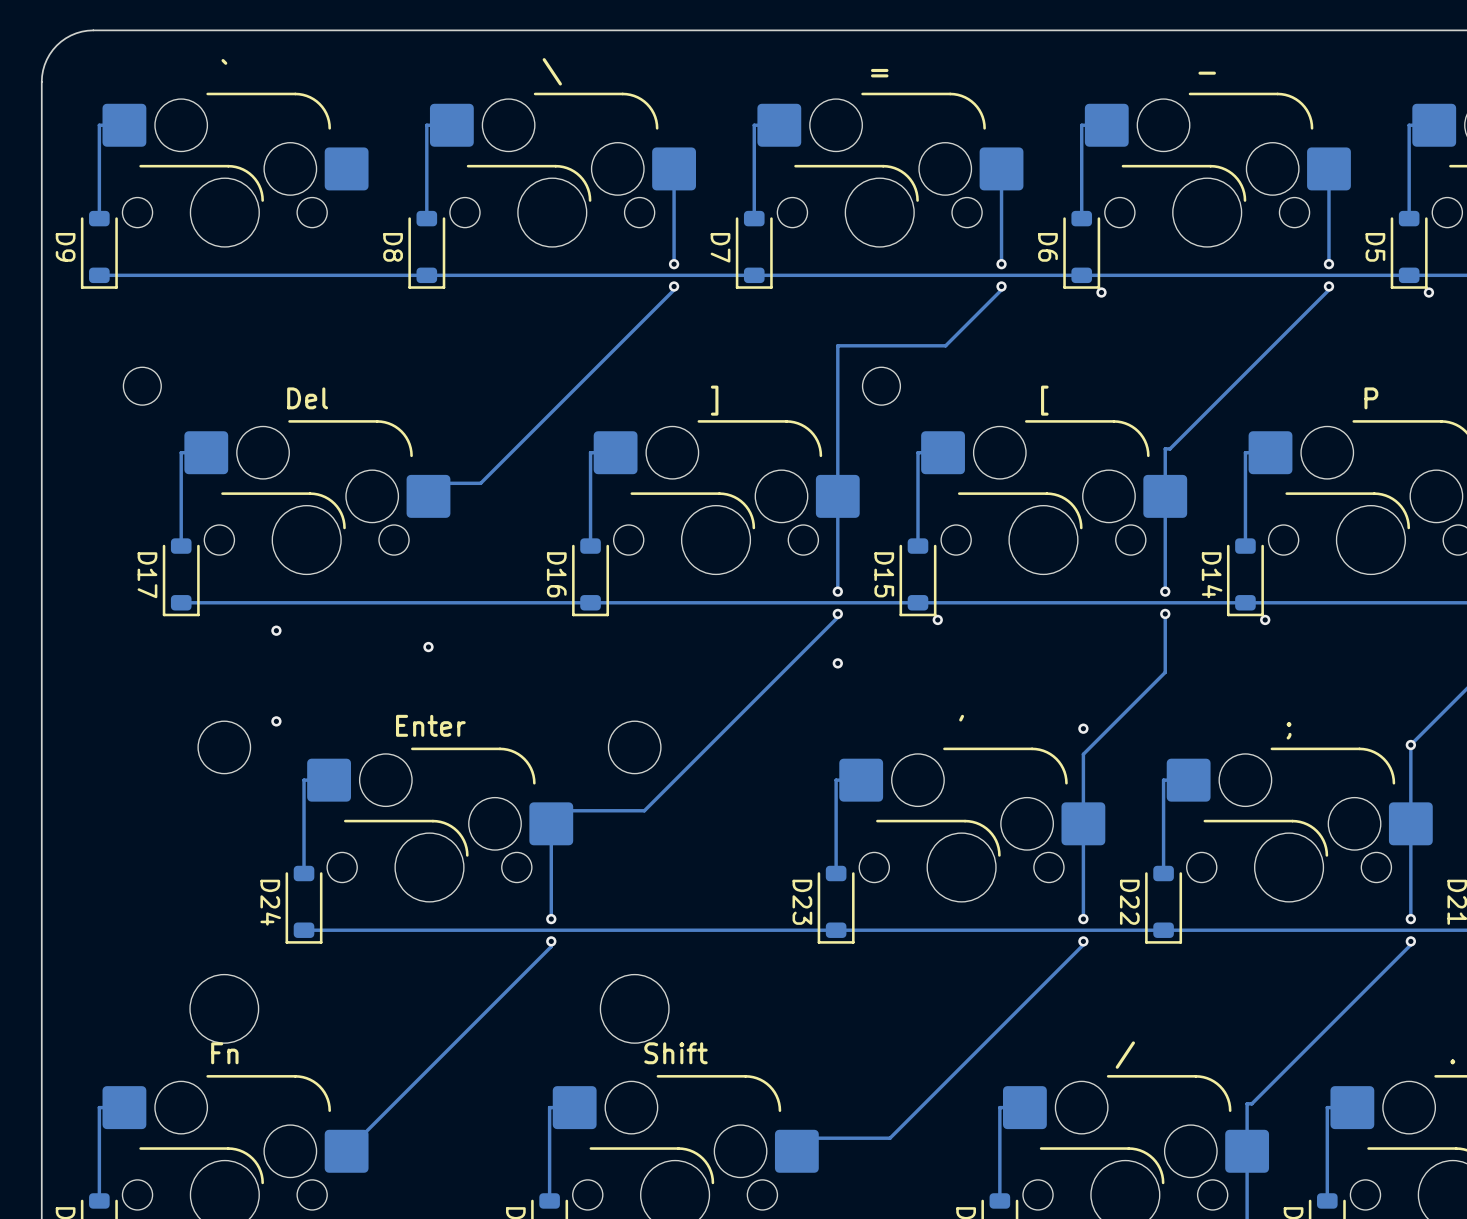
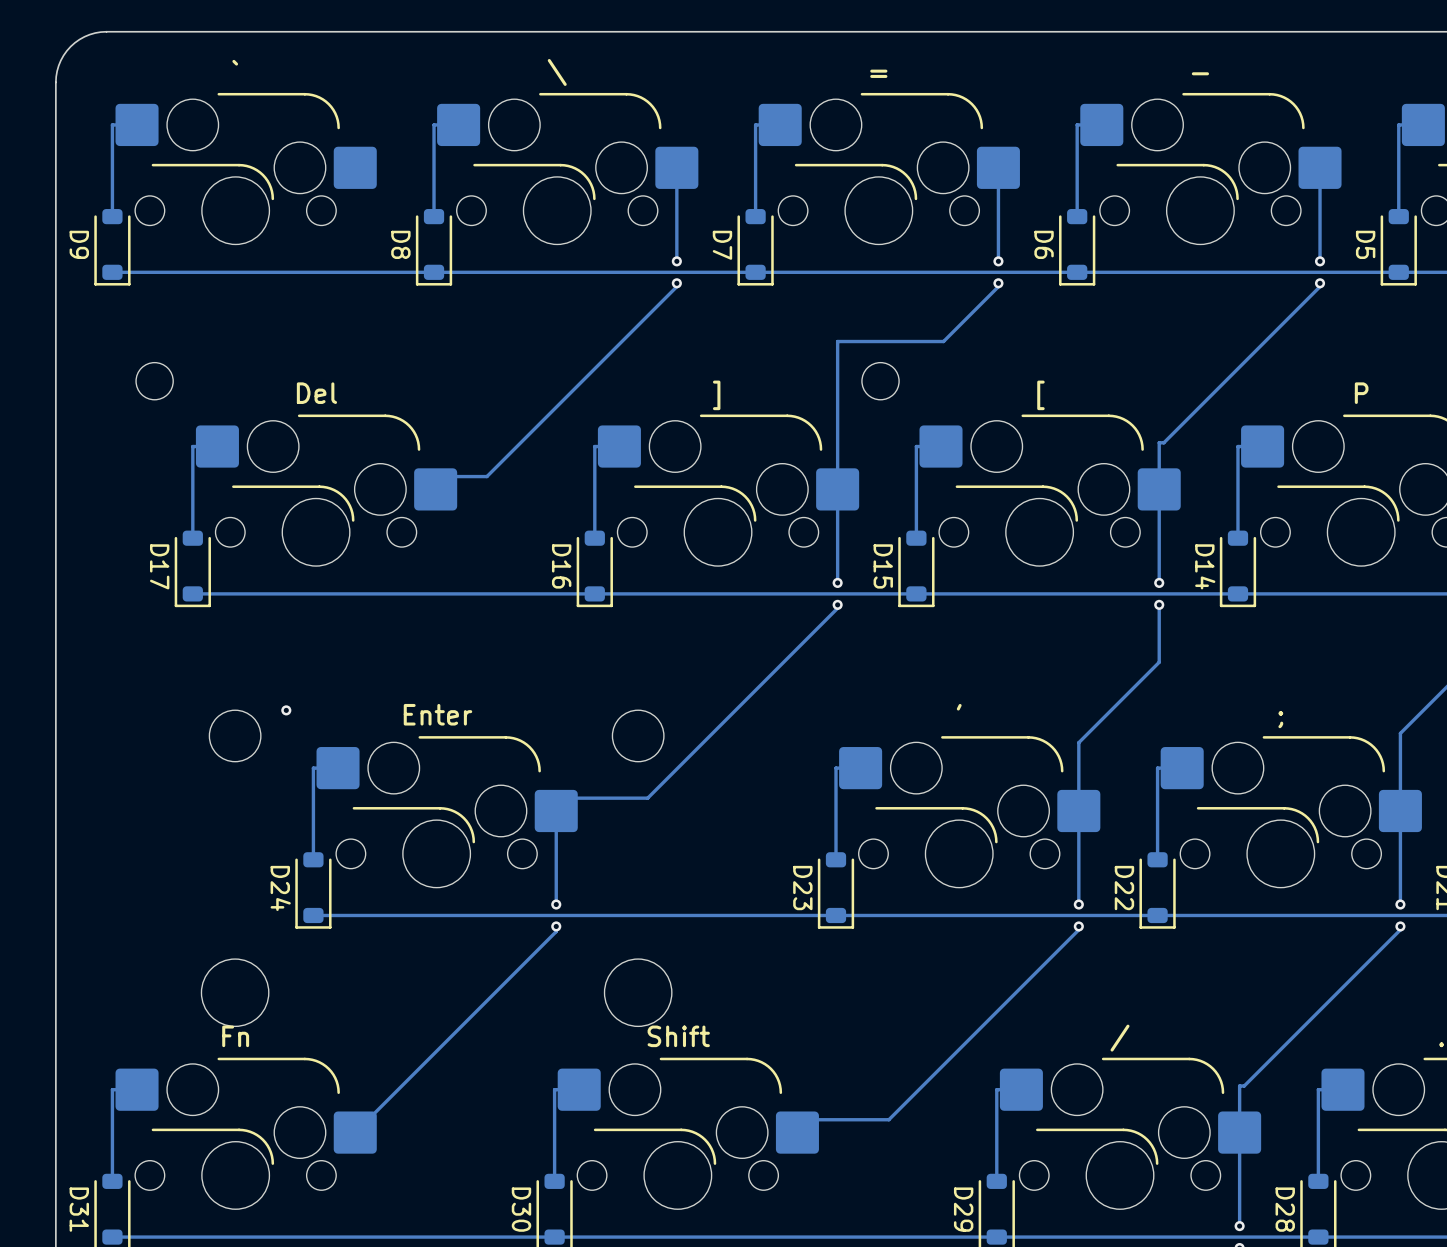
via: (1101, 292) -> none
via: (1428, 292) -> none
via: (937, 619) -> none
via: (1265, 619) -> none
via: (276, 630) -> none
via: (428, 647) -> none
via: (837, 663) -> none
via: (1083, 728) -> none
via: (1410, 745) -> none

